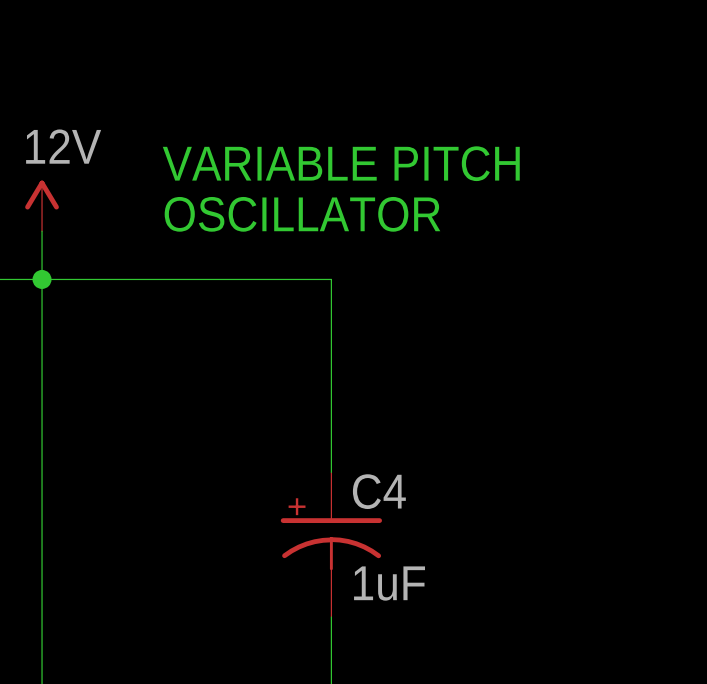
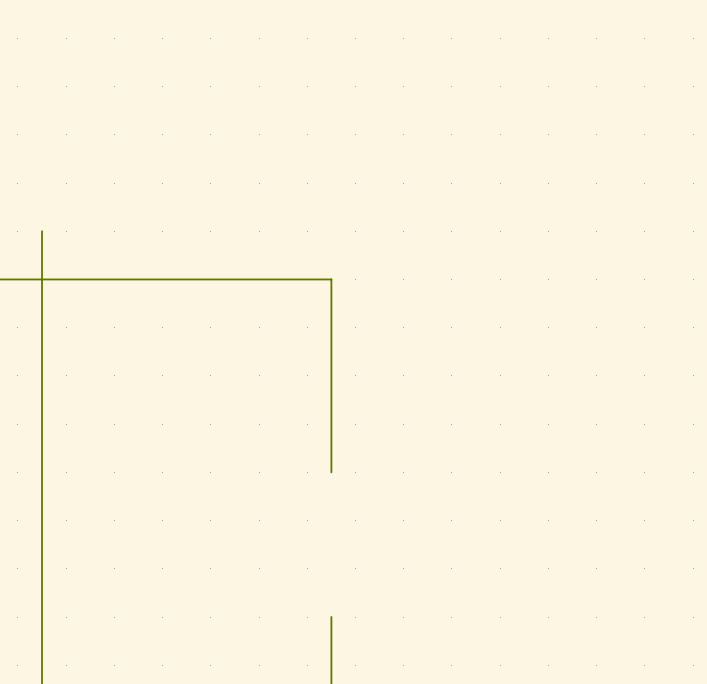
text: VARIABLE PITCH (341, 163) -> none
power symbol: 12V (42, 205) -> none
text: OSCILLATOR (302, 214) -> none
junction: (42, 279) -> none
C4: 1uF (331, 544) -> none

